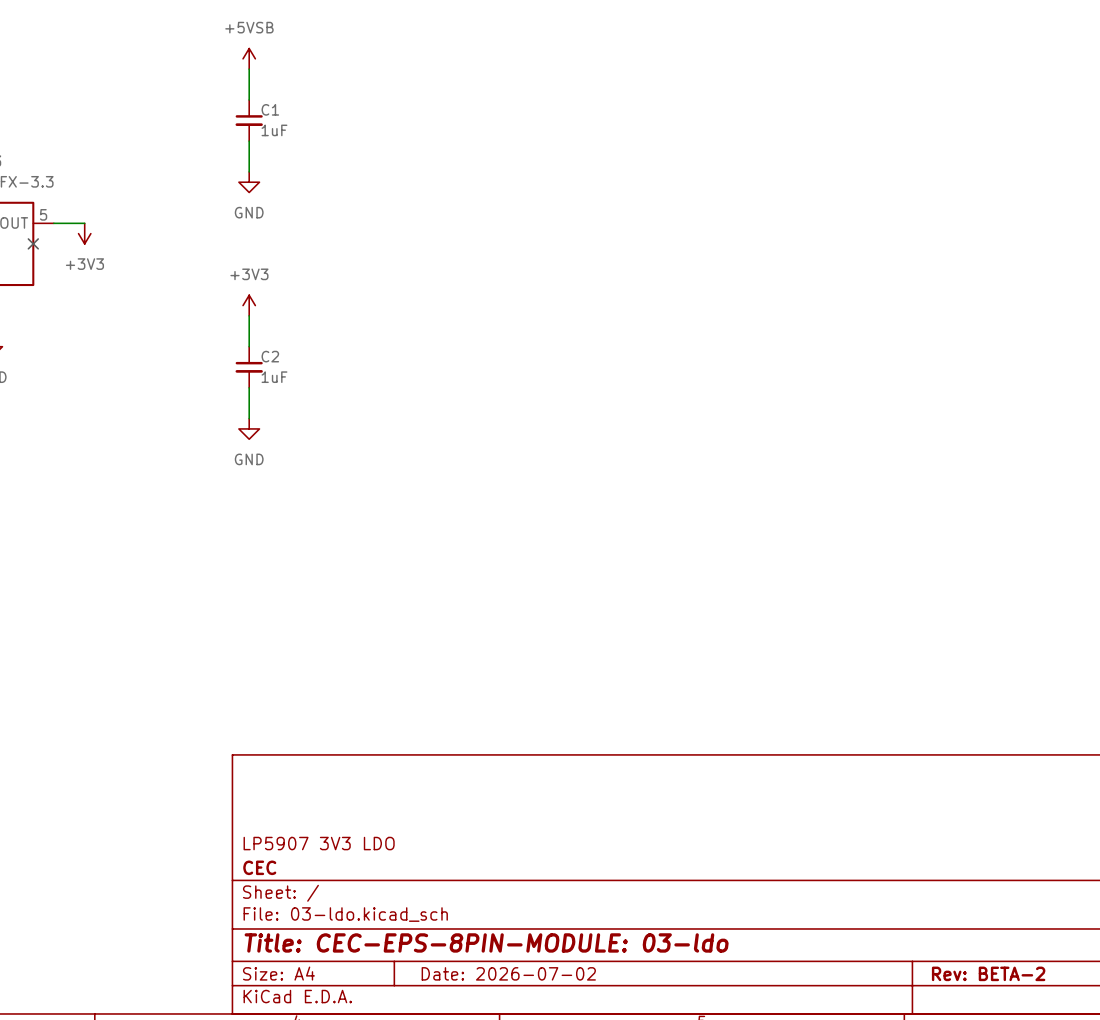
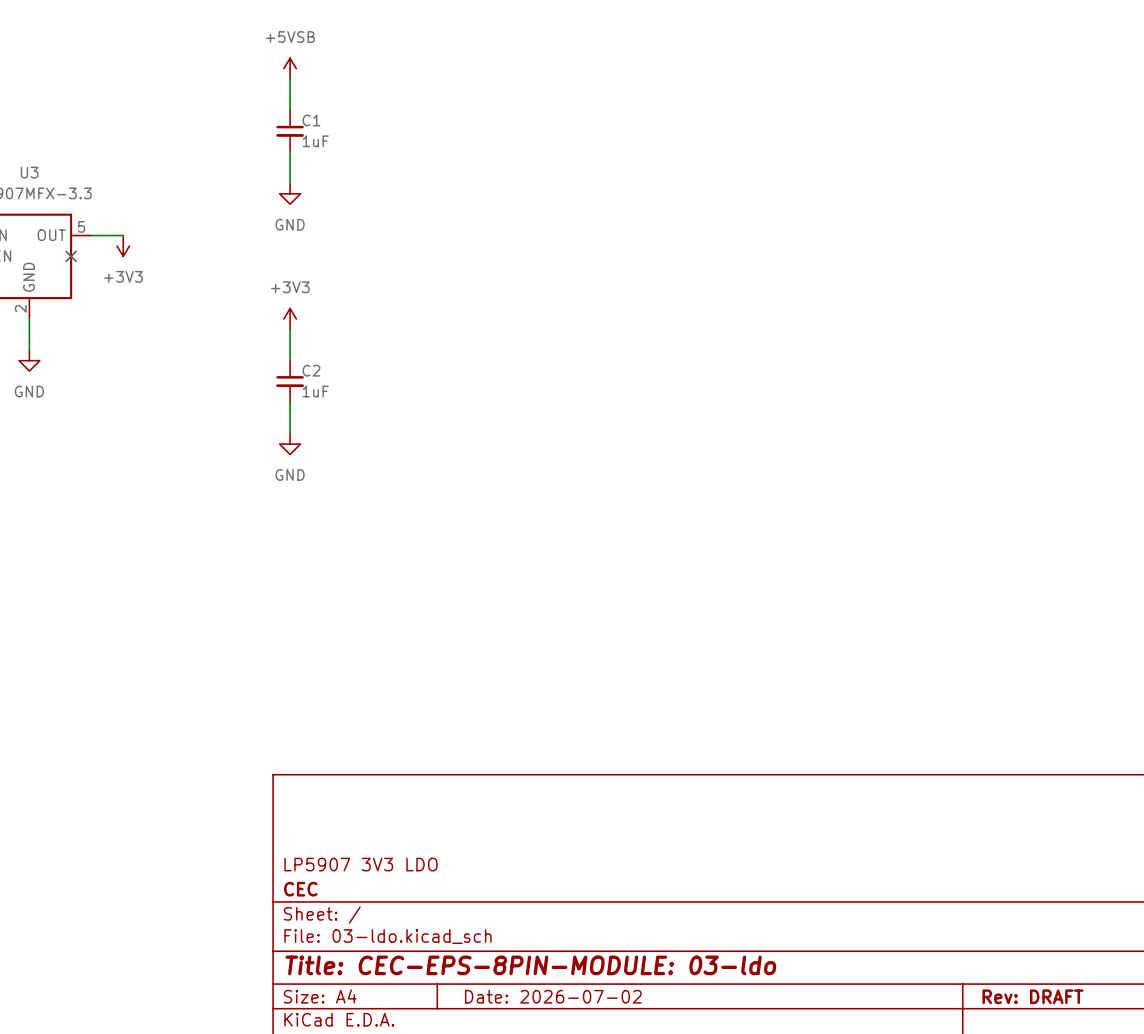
title block: Rev: BETA-2 (988, 973) -> Rev: DRAFT (1032, 996)

